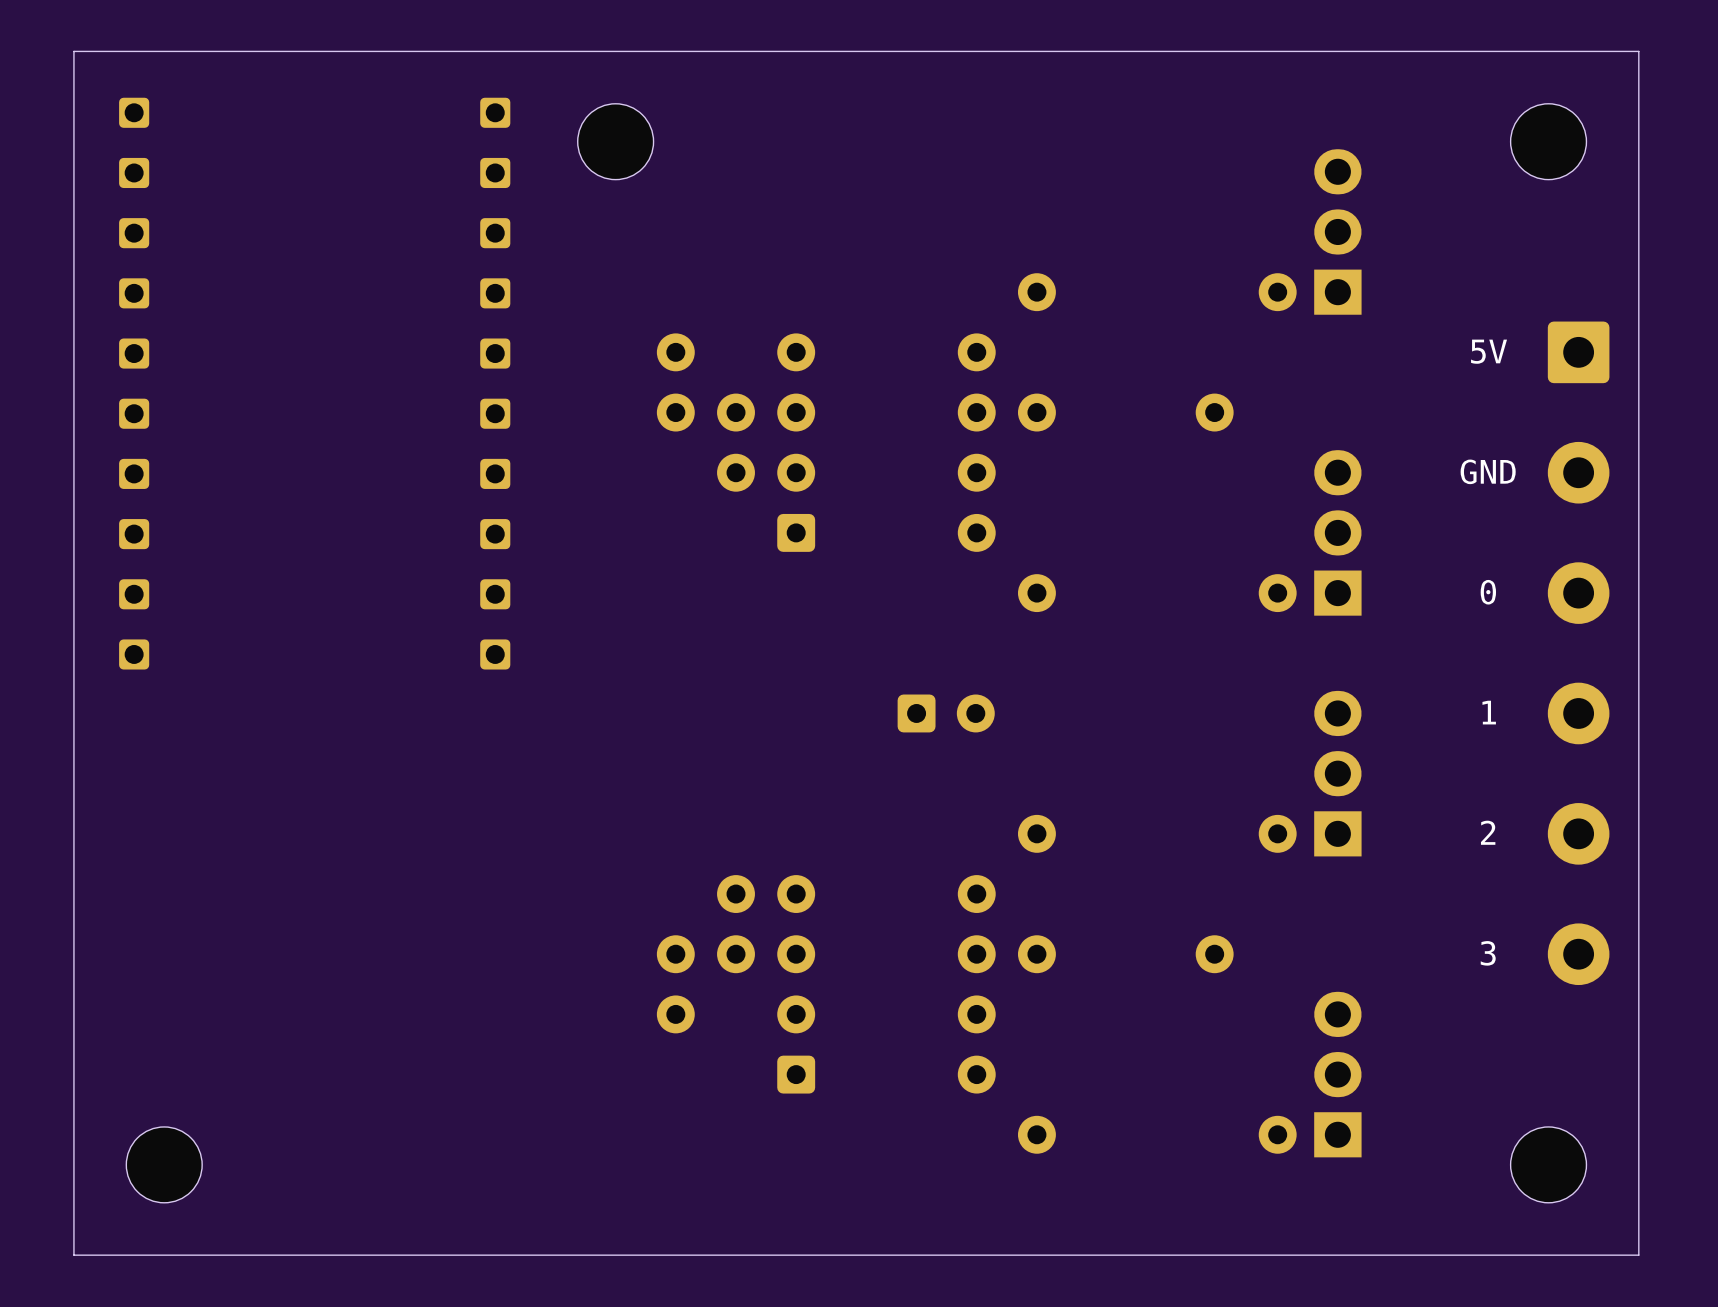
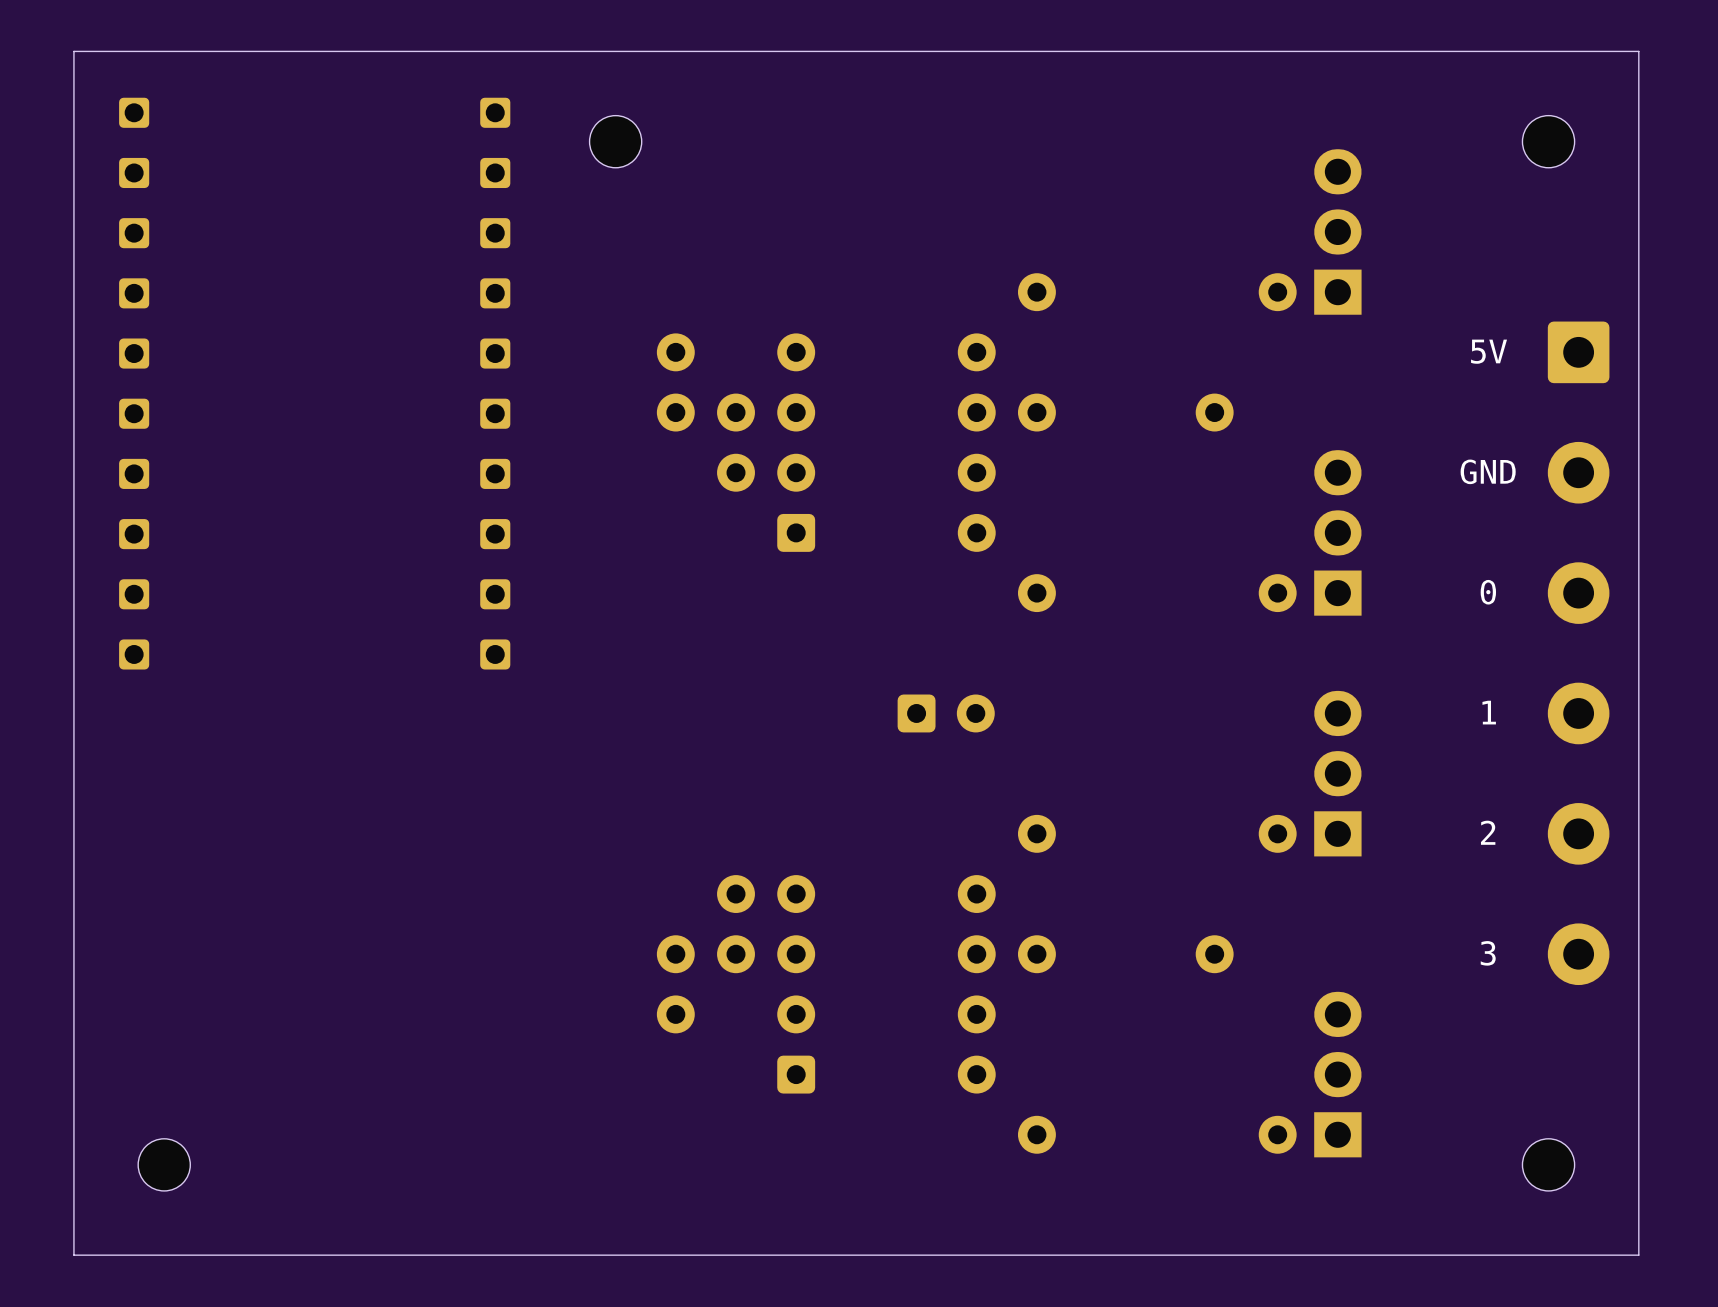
part footprint: [577, 103, 654, 180] -> [589, 115, 642, 168]
part footprint: [1510, 103, 1587, 180] -> [1522, 115, 1575, 168]
part footprint: [126, 1126, 203, 1203] -> [138, 1138, 191, 1191]
part footprint: [1510, 1126, 1587, 1203] -> [1522, 1138, 1575, 1191]

